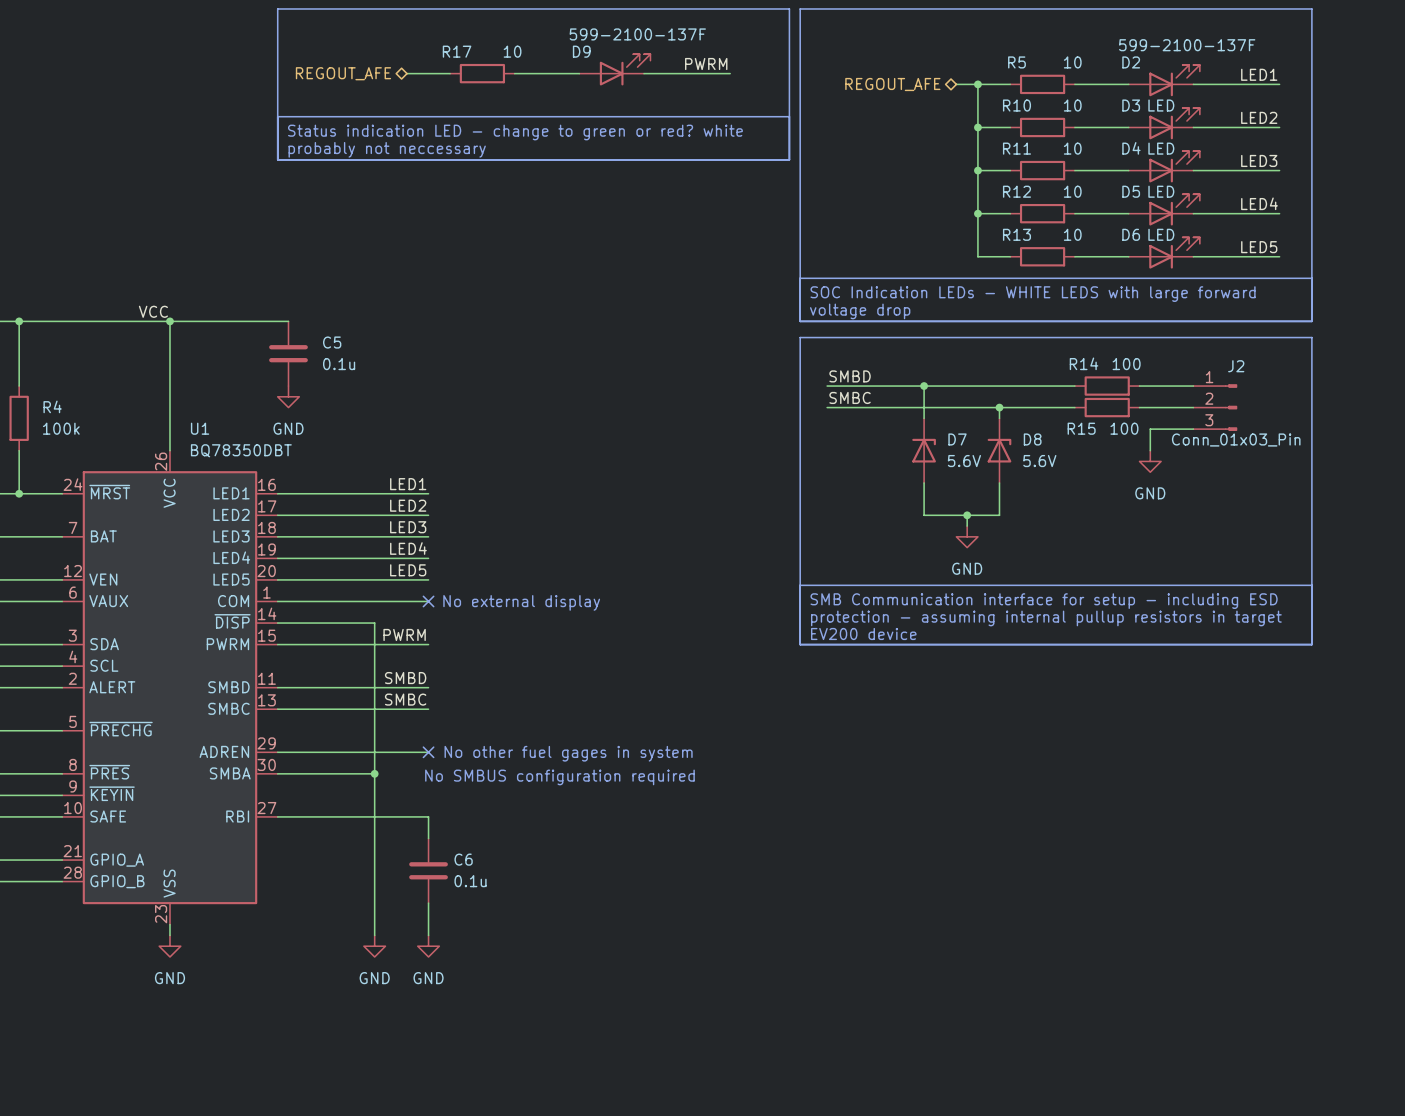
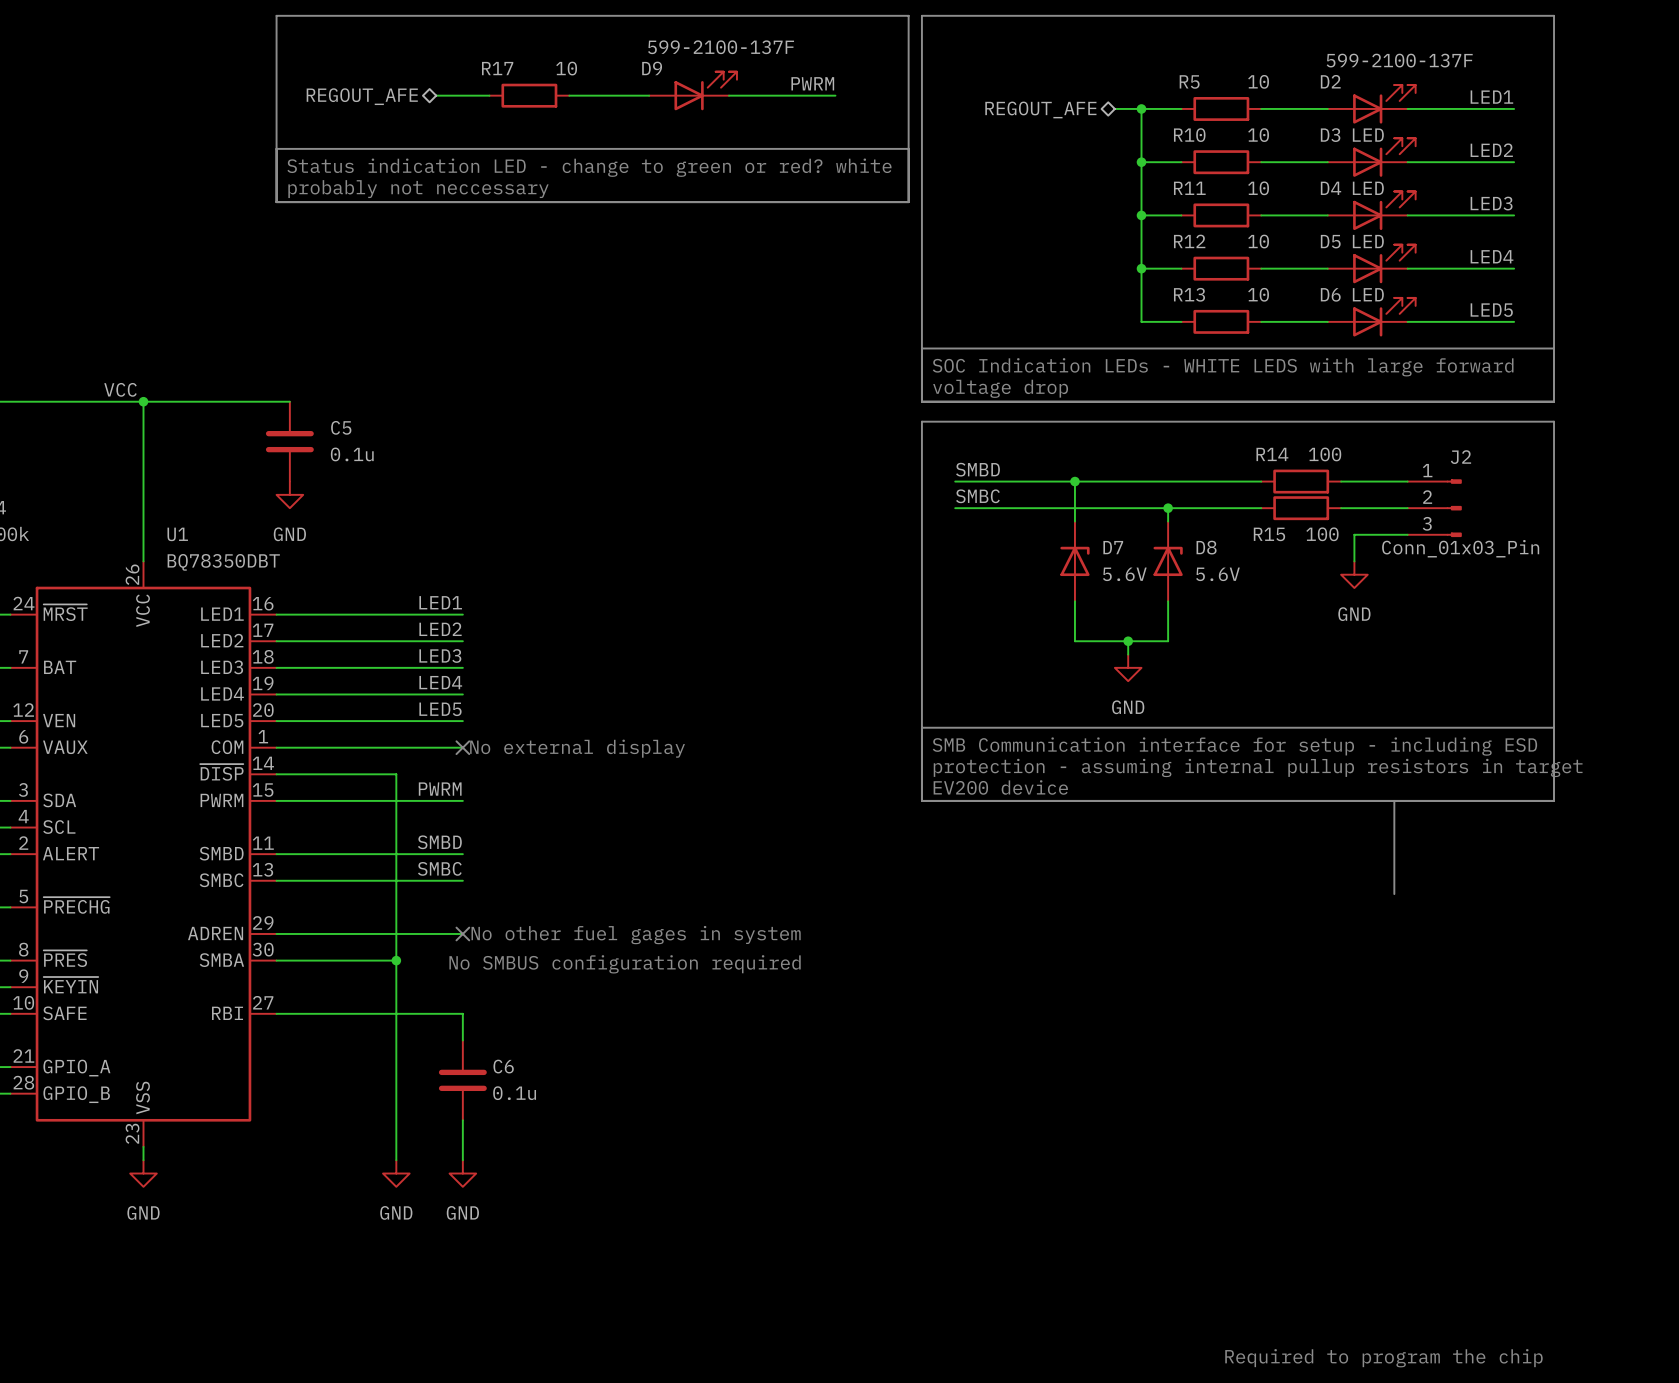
line: none -> (1394, 800) (1394, 894)
text: none -> Required to program the chip (1383, 1358)

